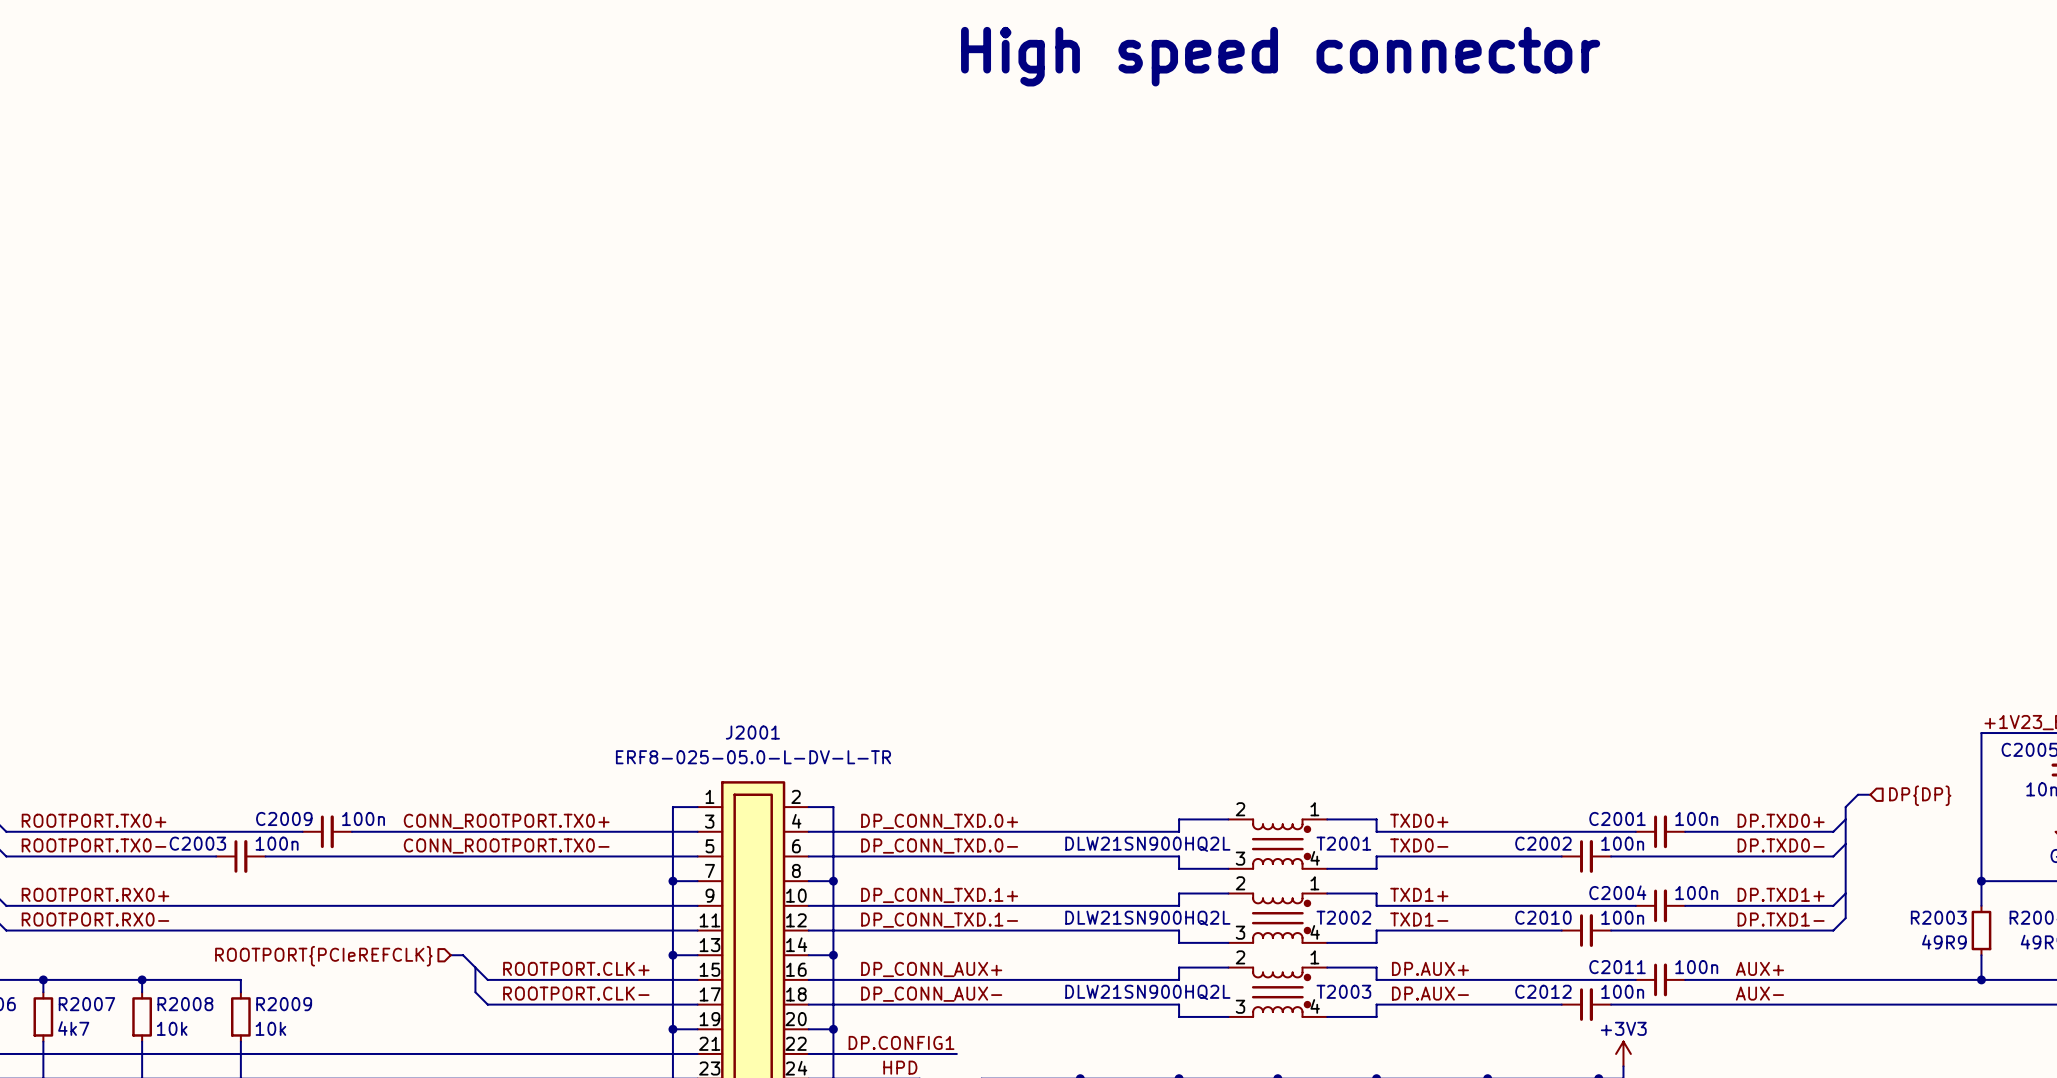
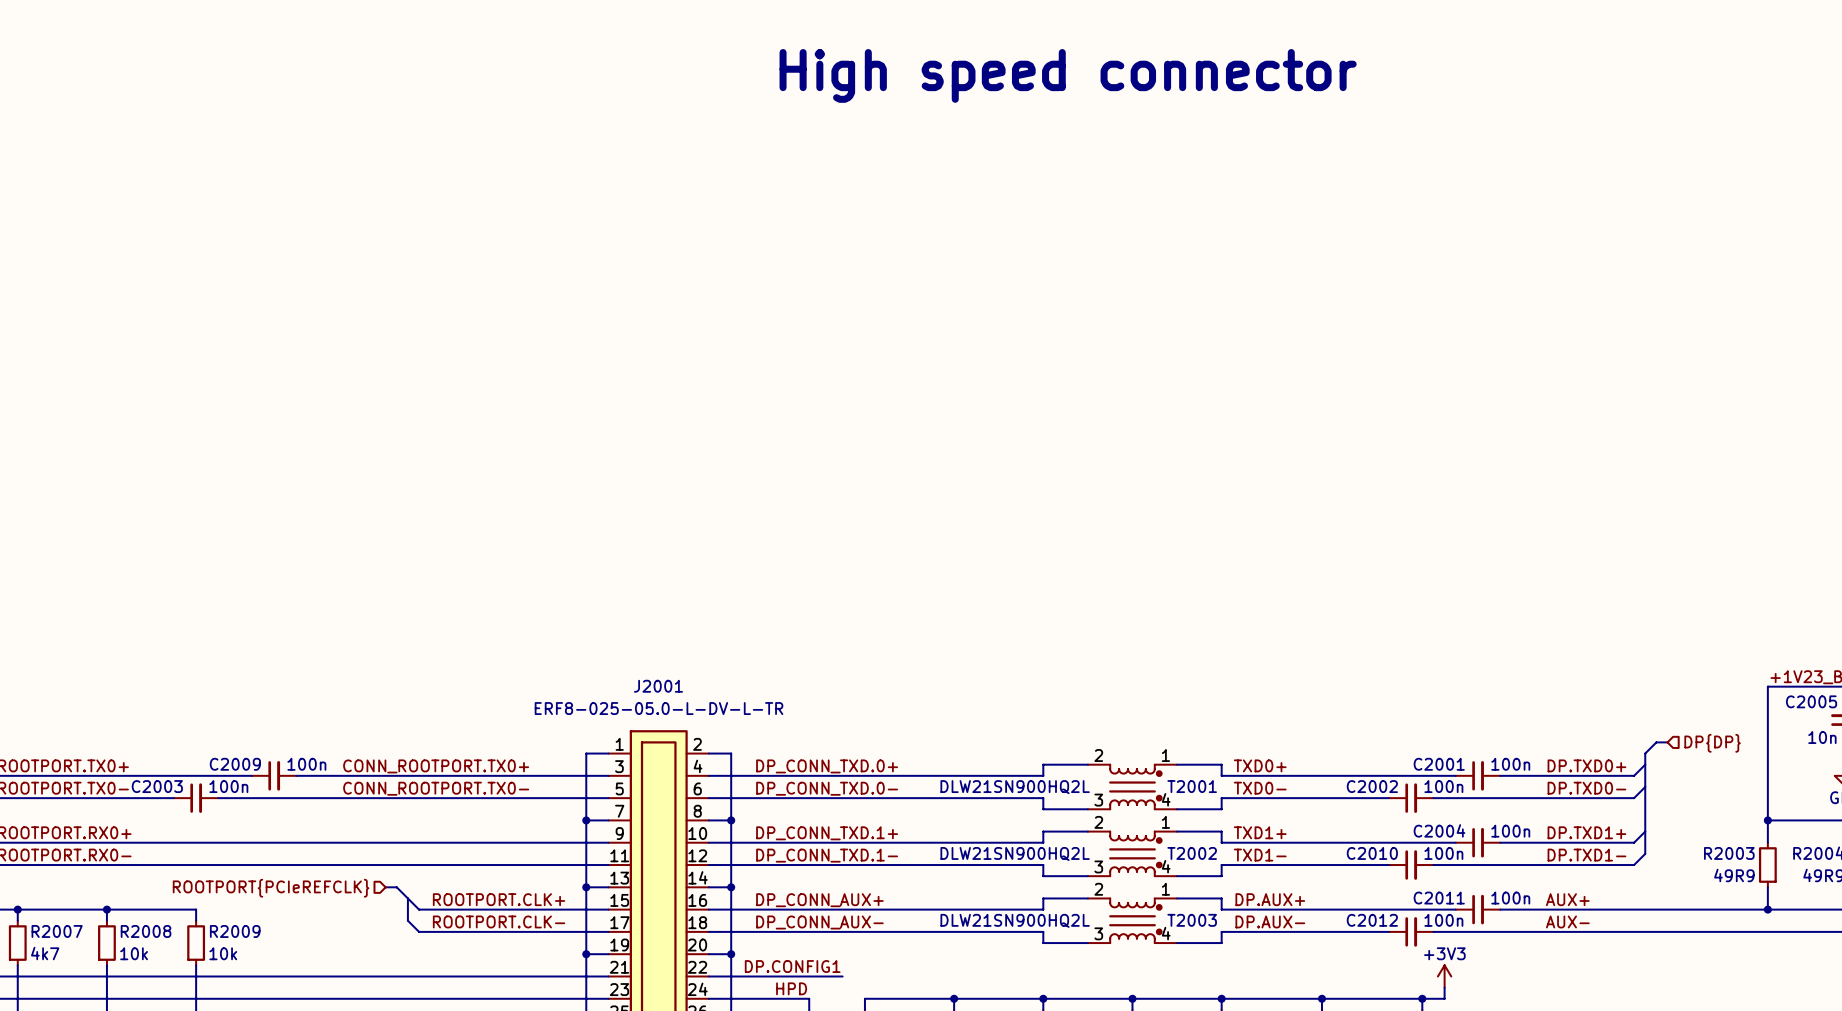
text position: High speed connector (1280, 56) -> High speed connector (1068, 75)

